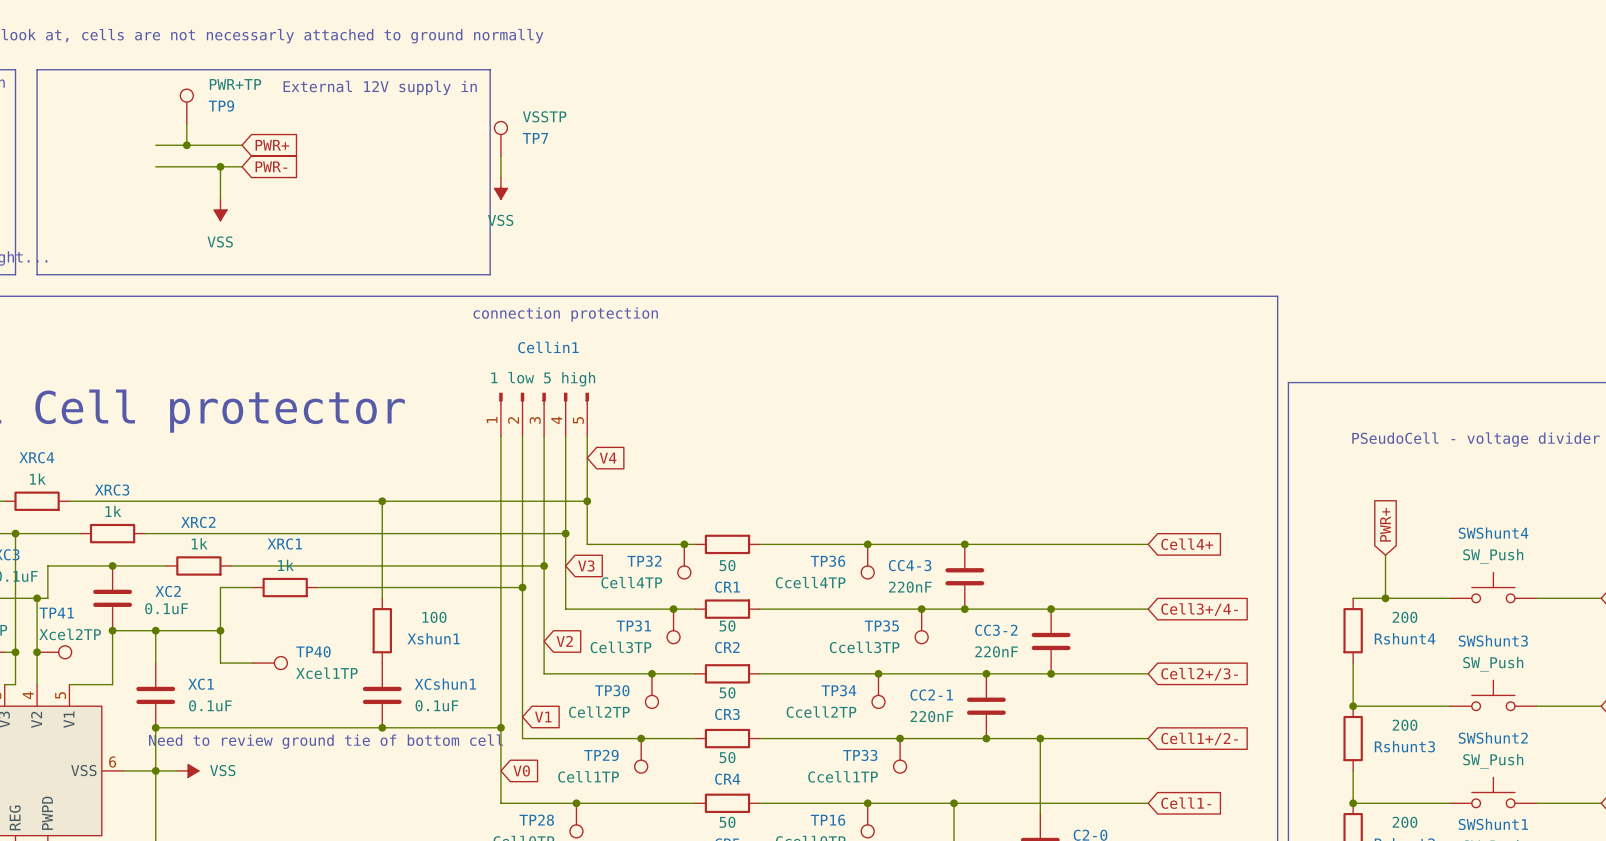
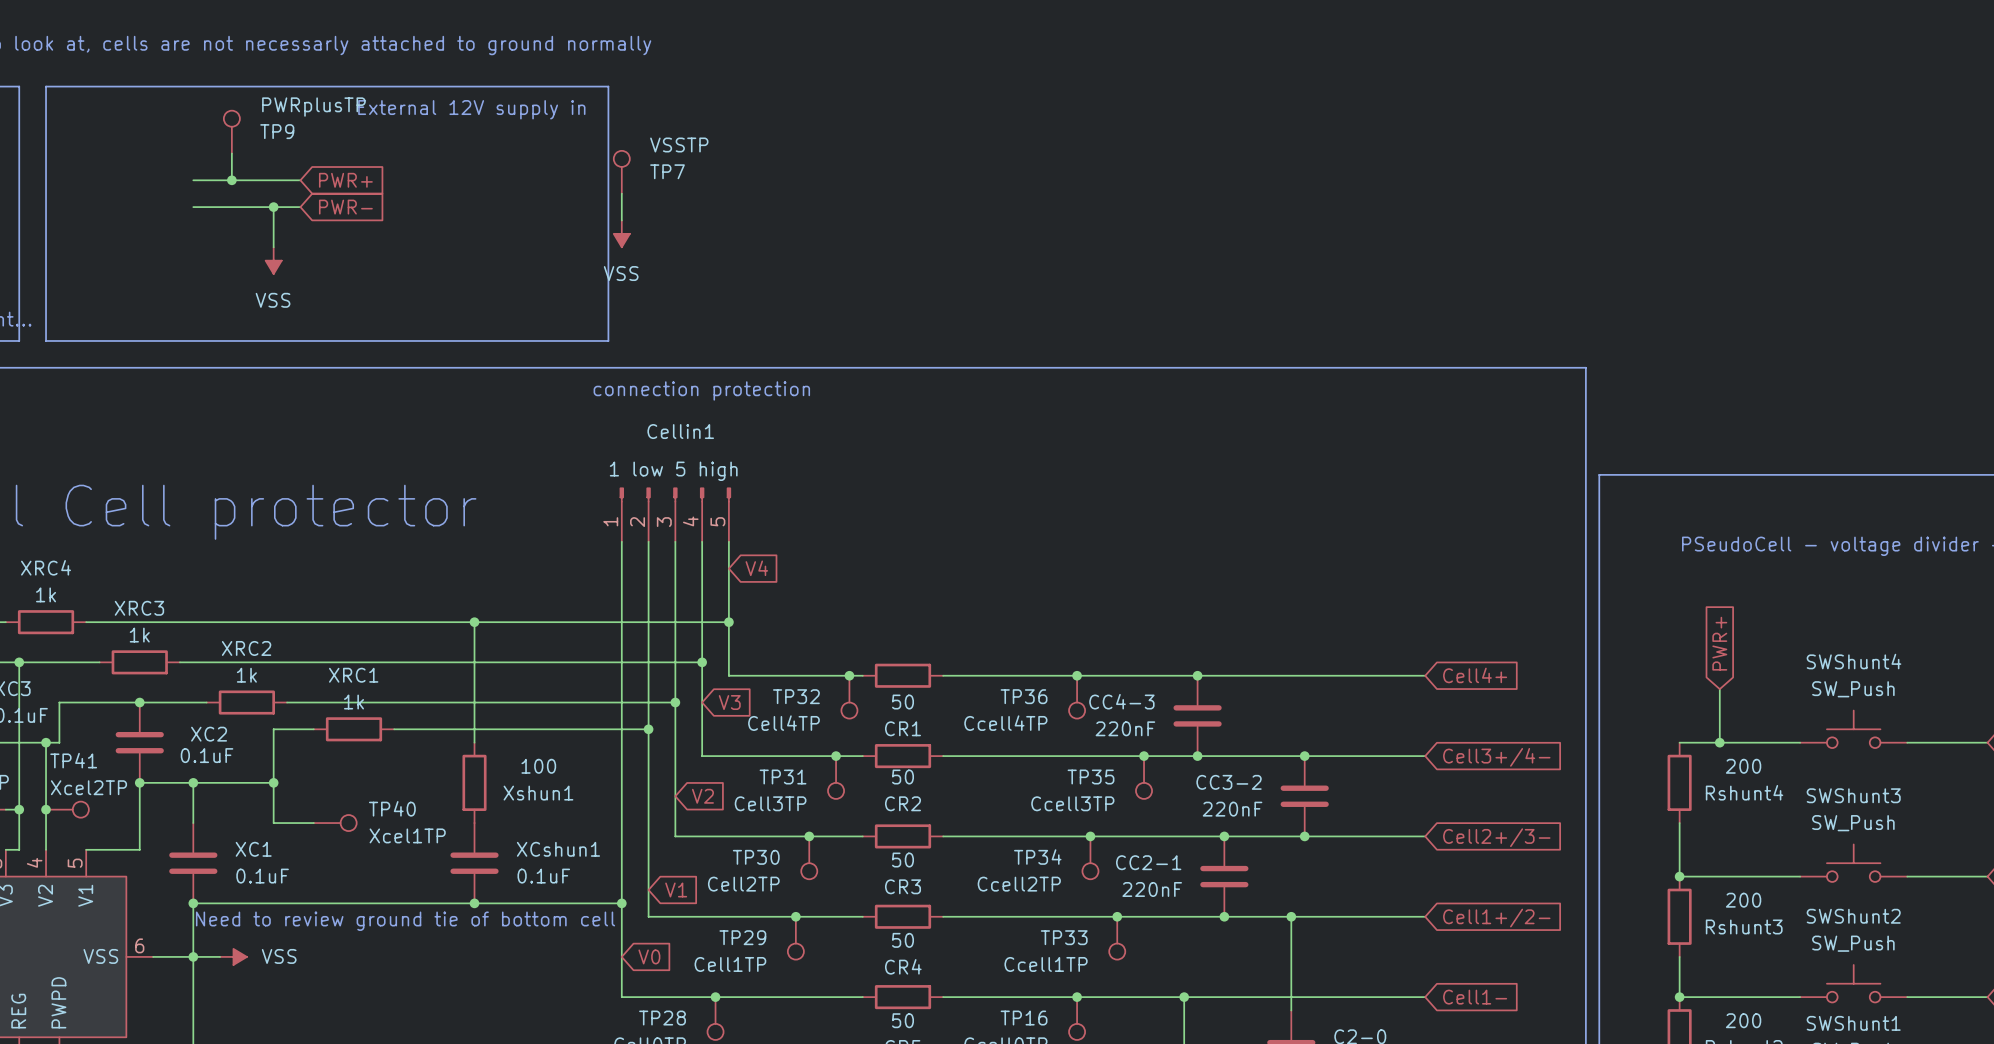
TP9 value: PWR+TP (235, 84) -> PWRplusTP (313, 107)

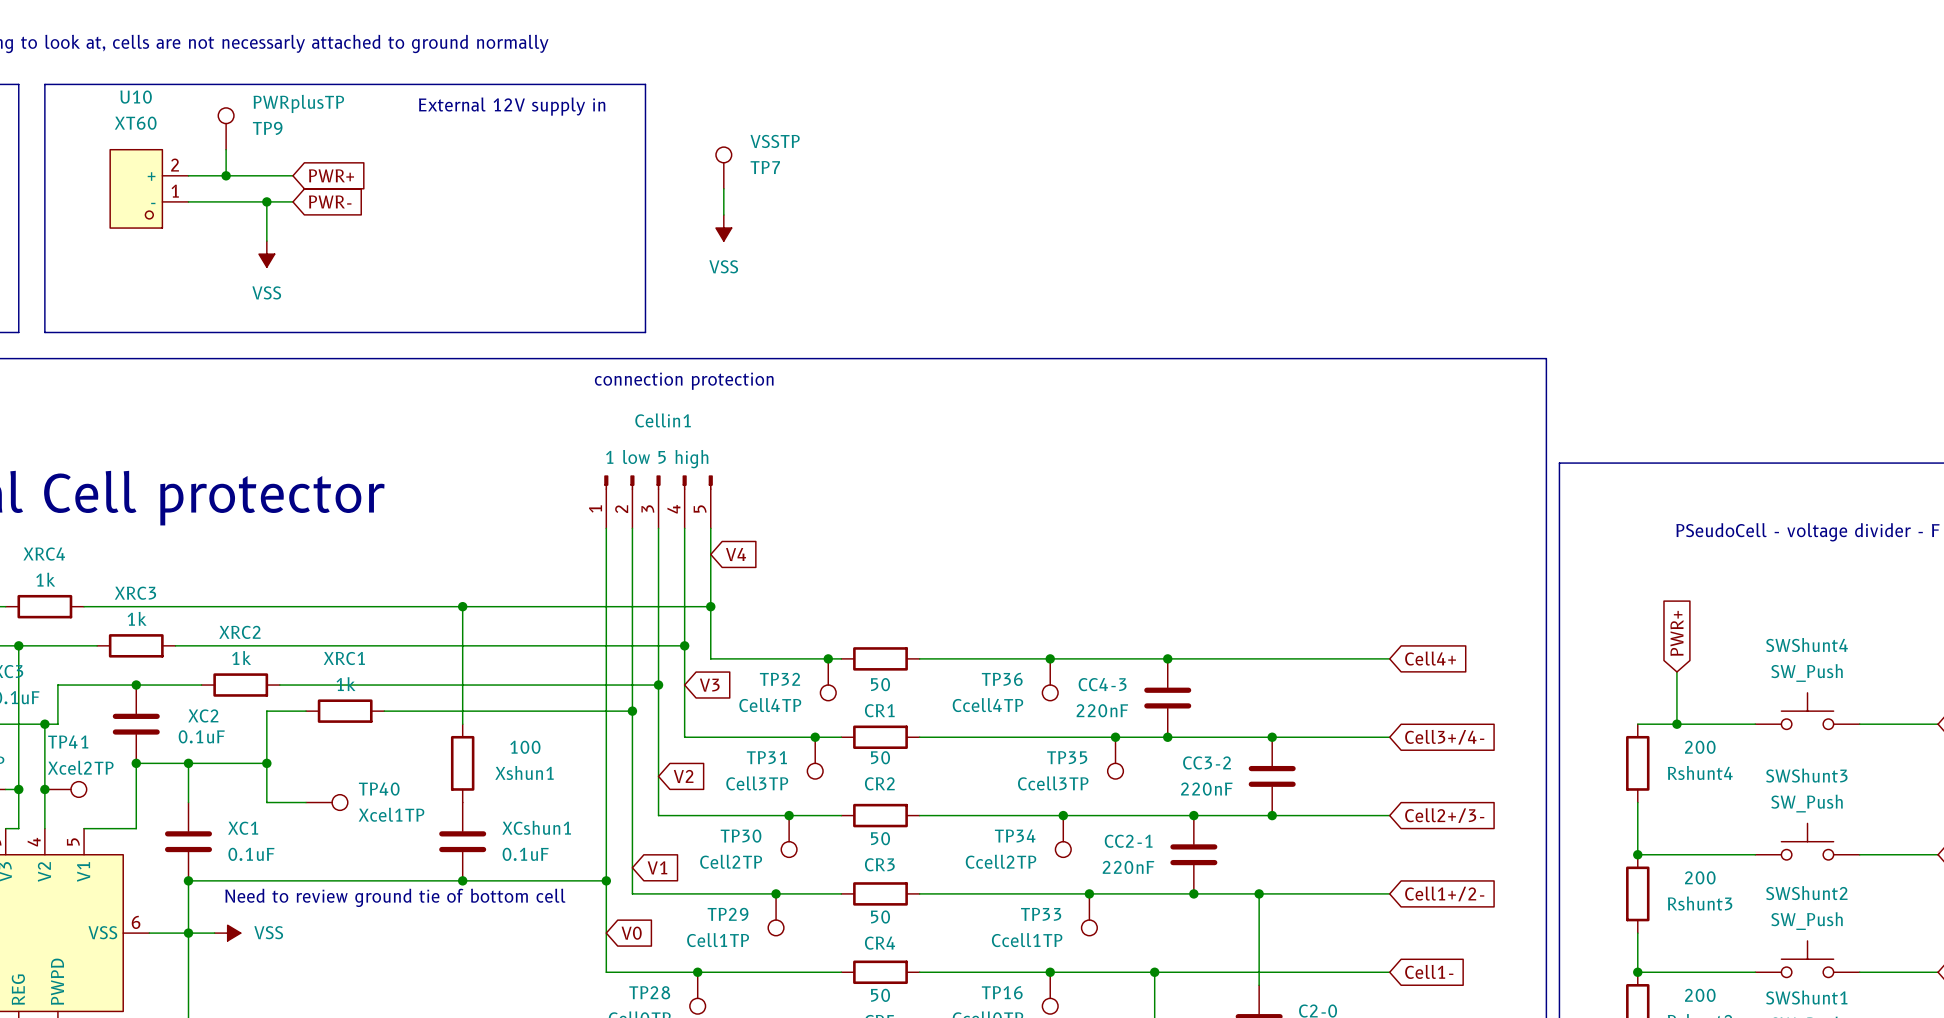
line: (608, 86) (608, 340) -> (593, 84) (645, 84) (645, 332) (593, 332)
text position: External 12V supply in (471, 109) -> External 12V supply in (512, 106)
TP7 position: (621, 172) -> (723, 167)
U10: none -> XT60 (149, 188)
wire: (621, 193) (621, 220) -> (723, 188) (723, 214)
power symbol position: VSS (621, 233) -> VSS (723, 228)

